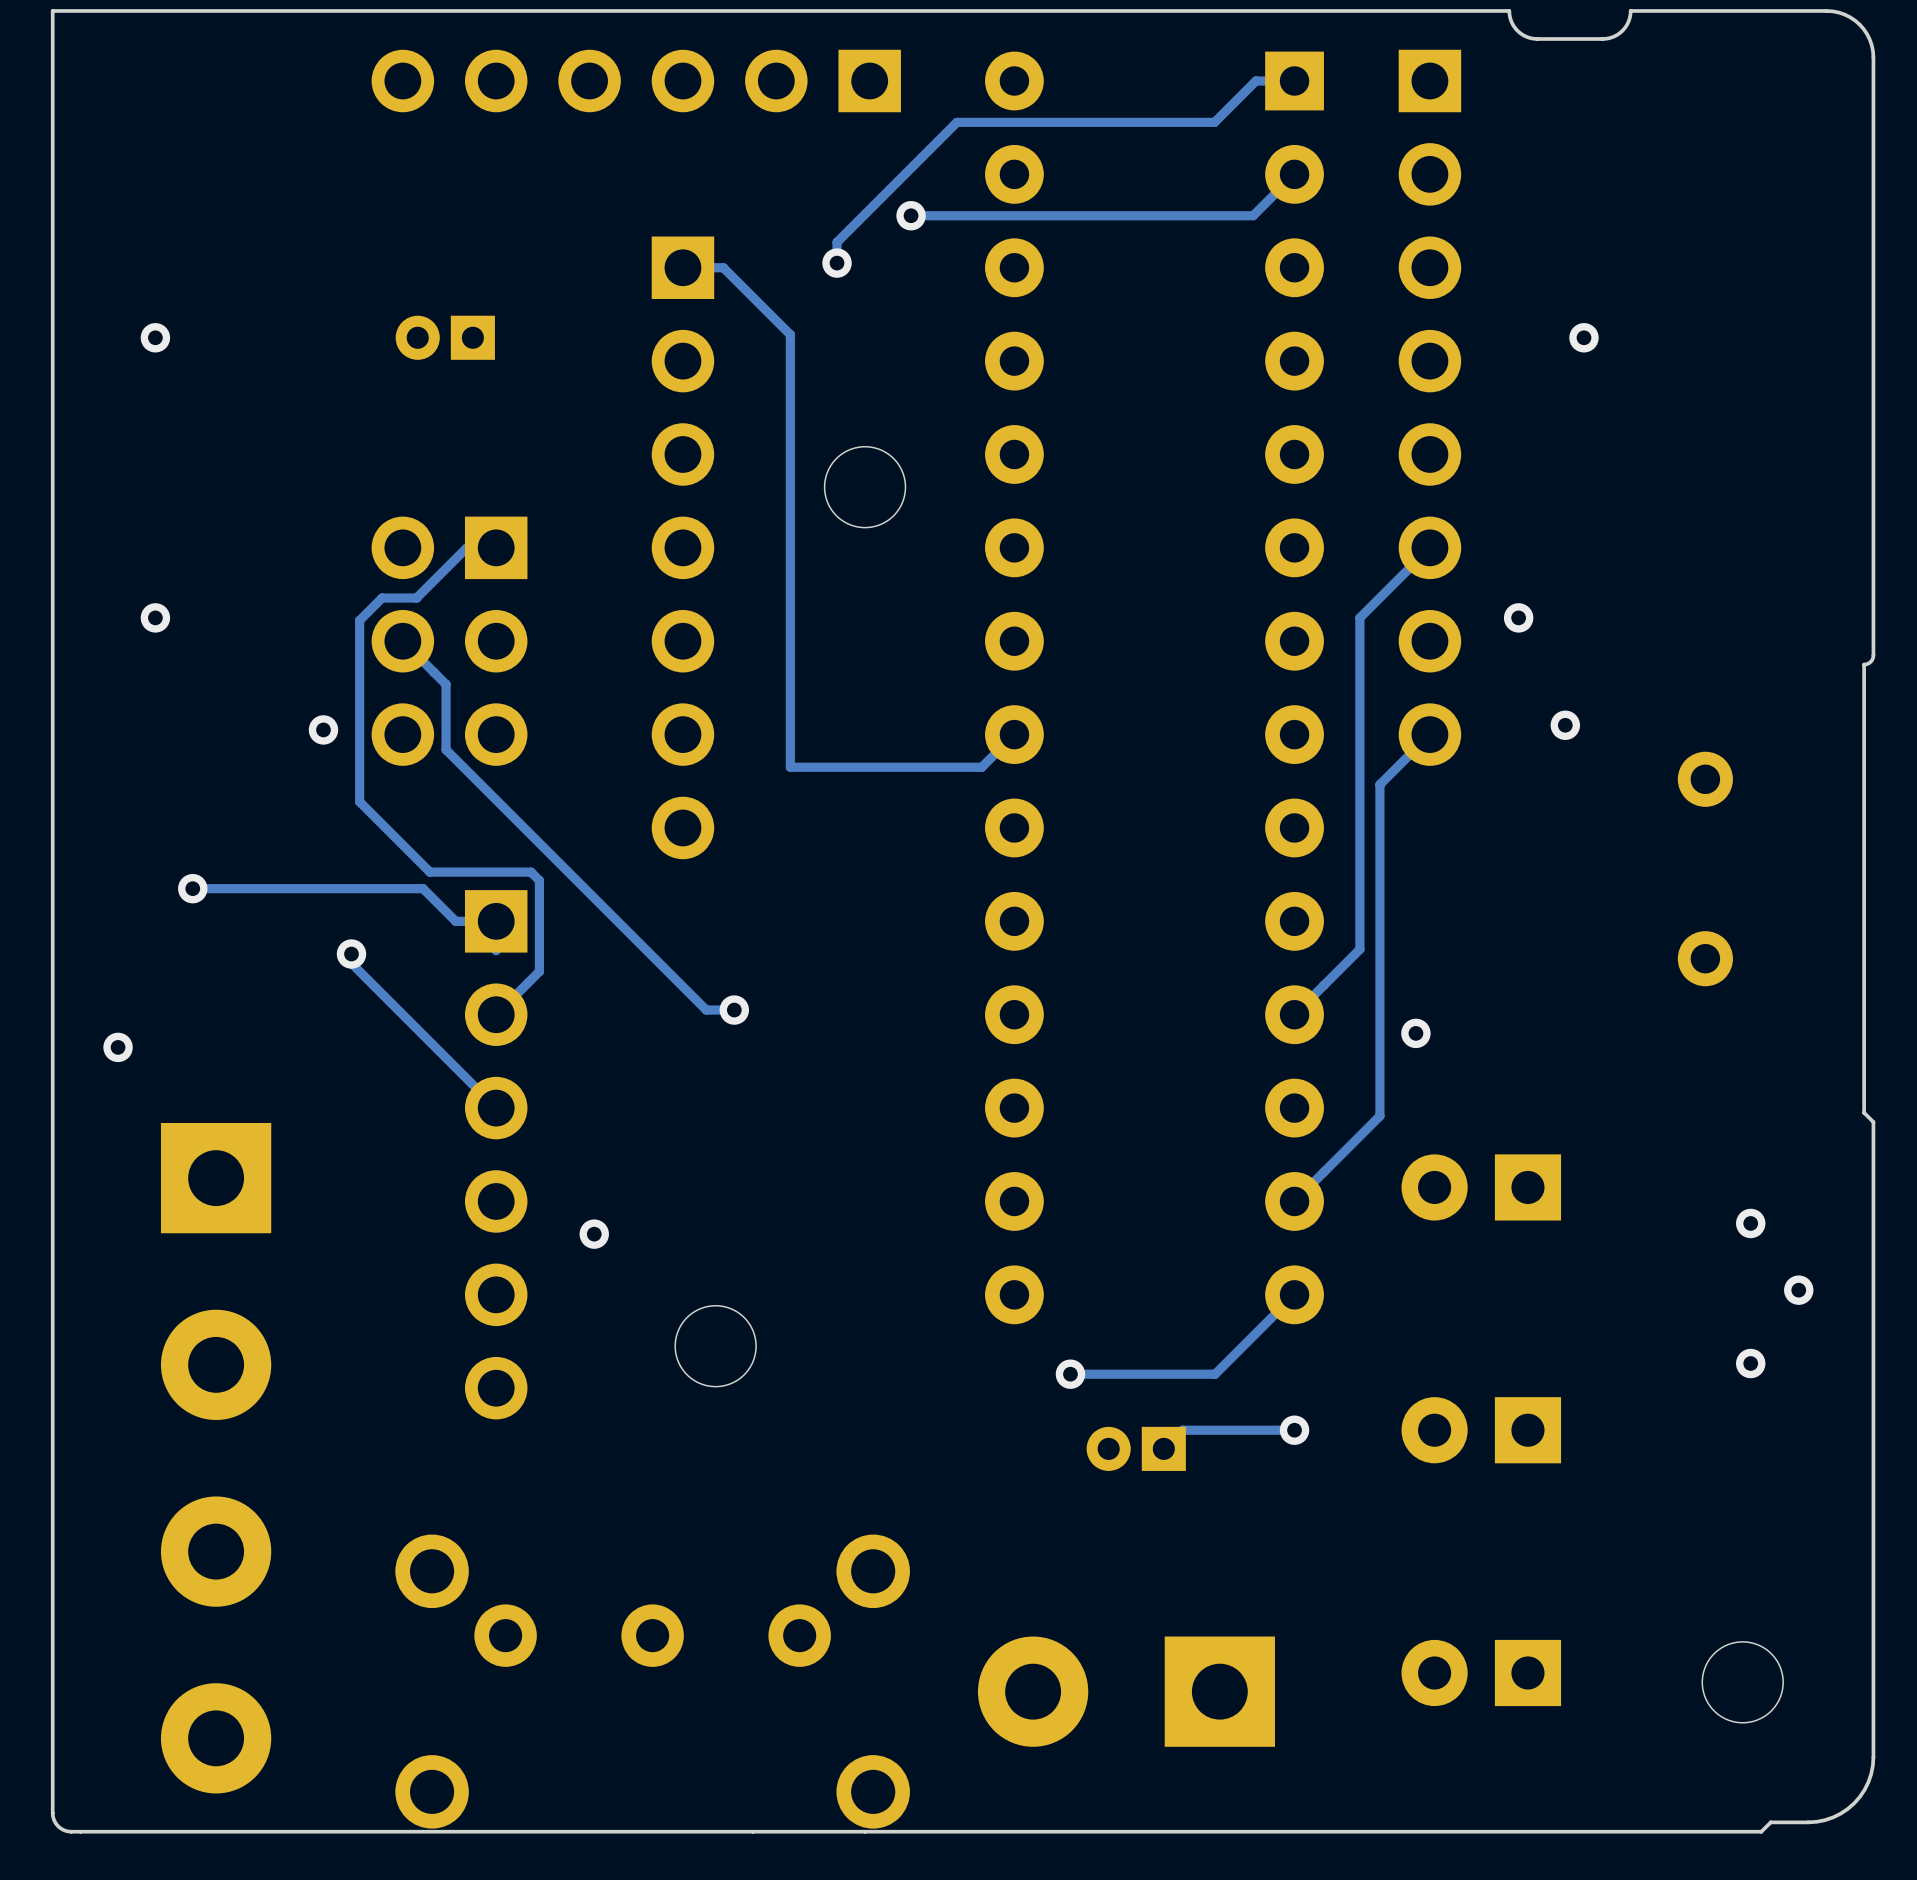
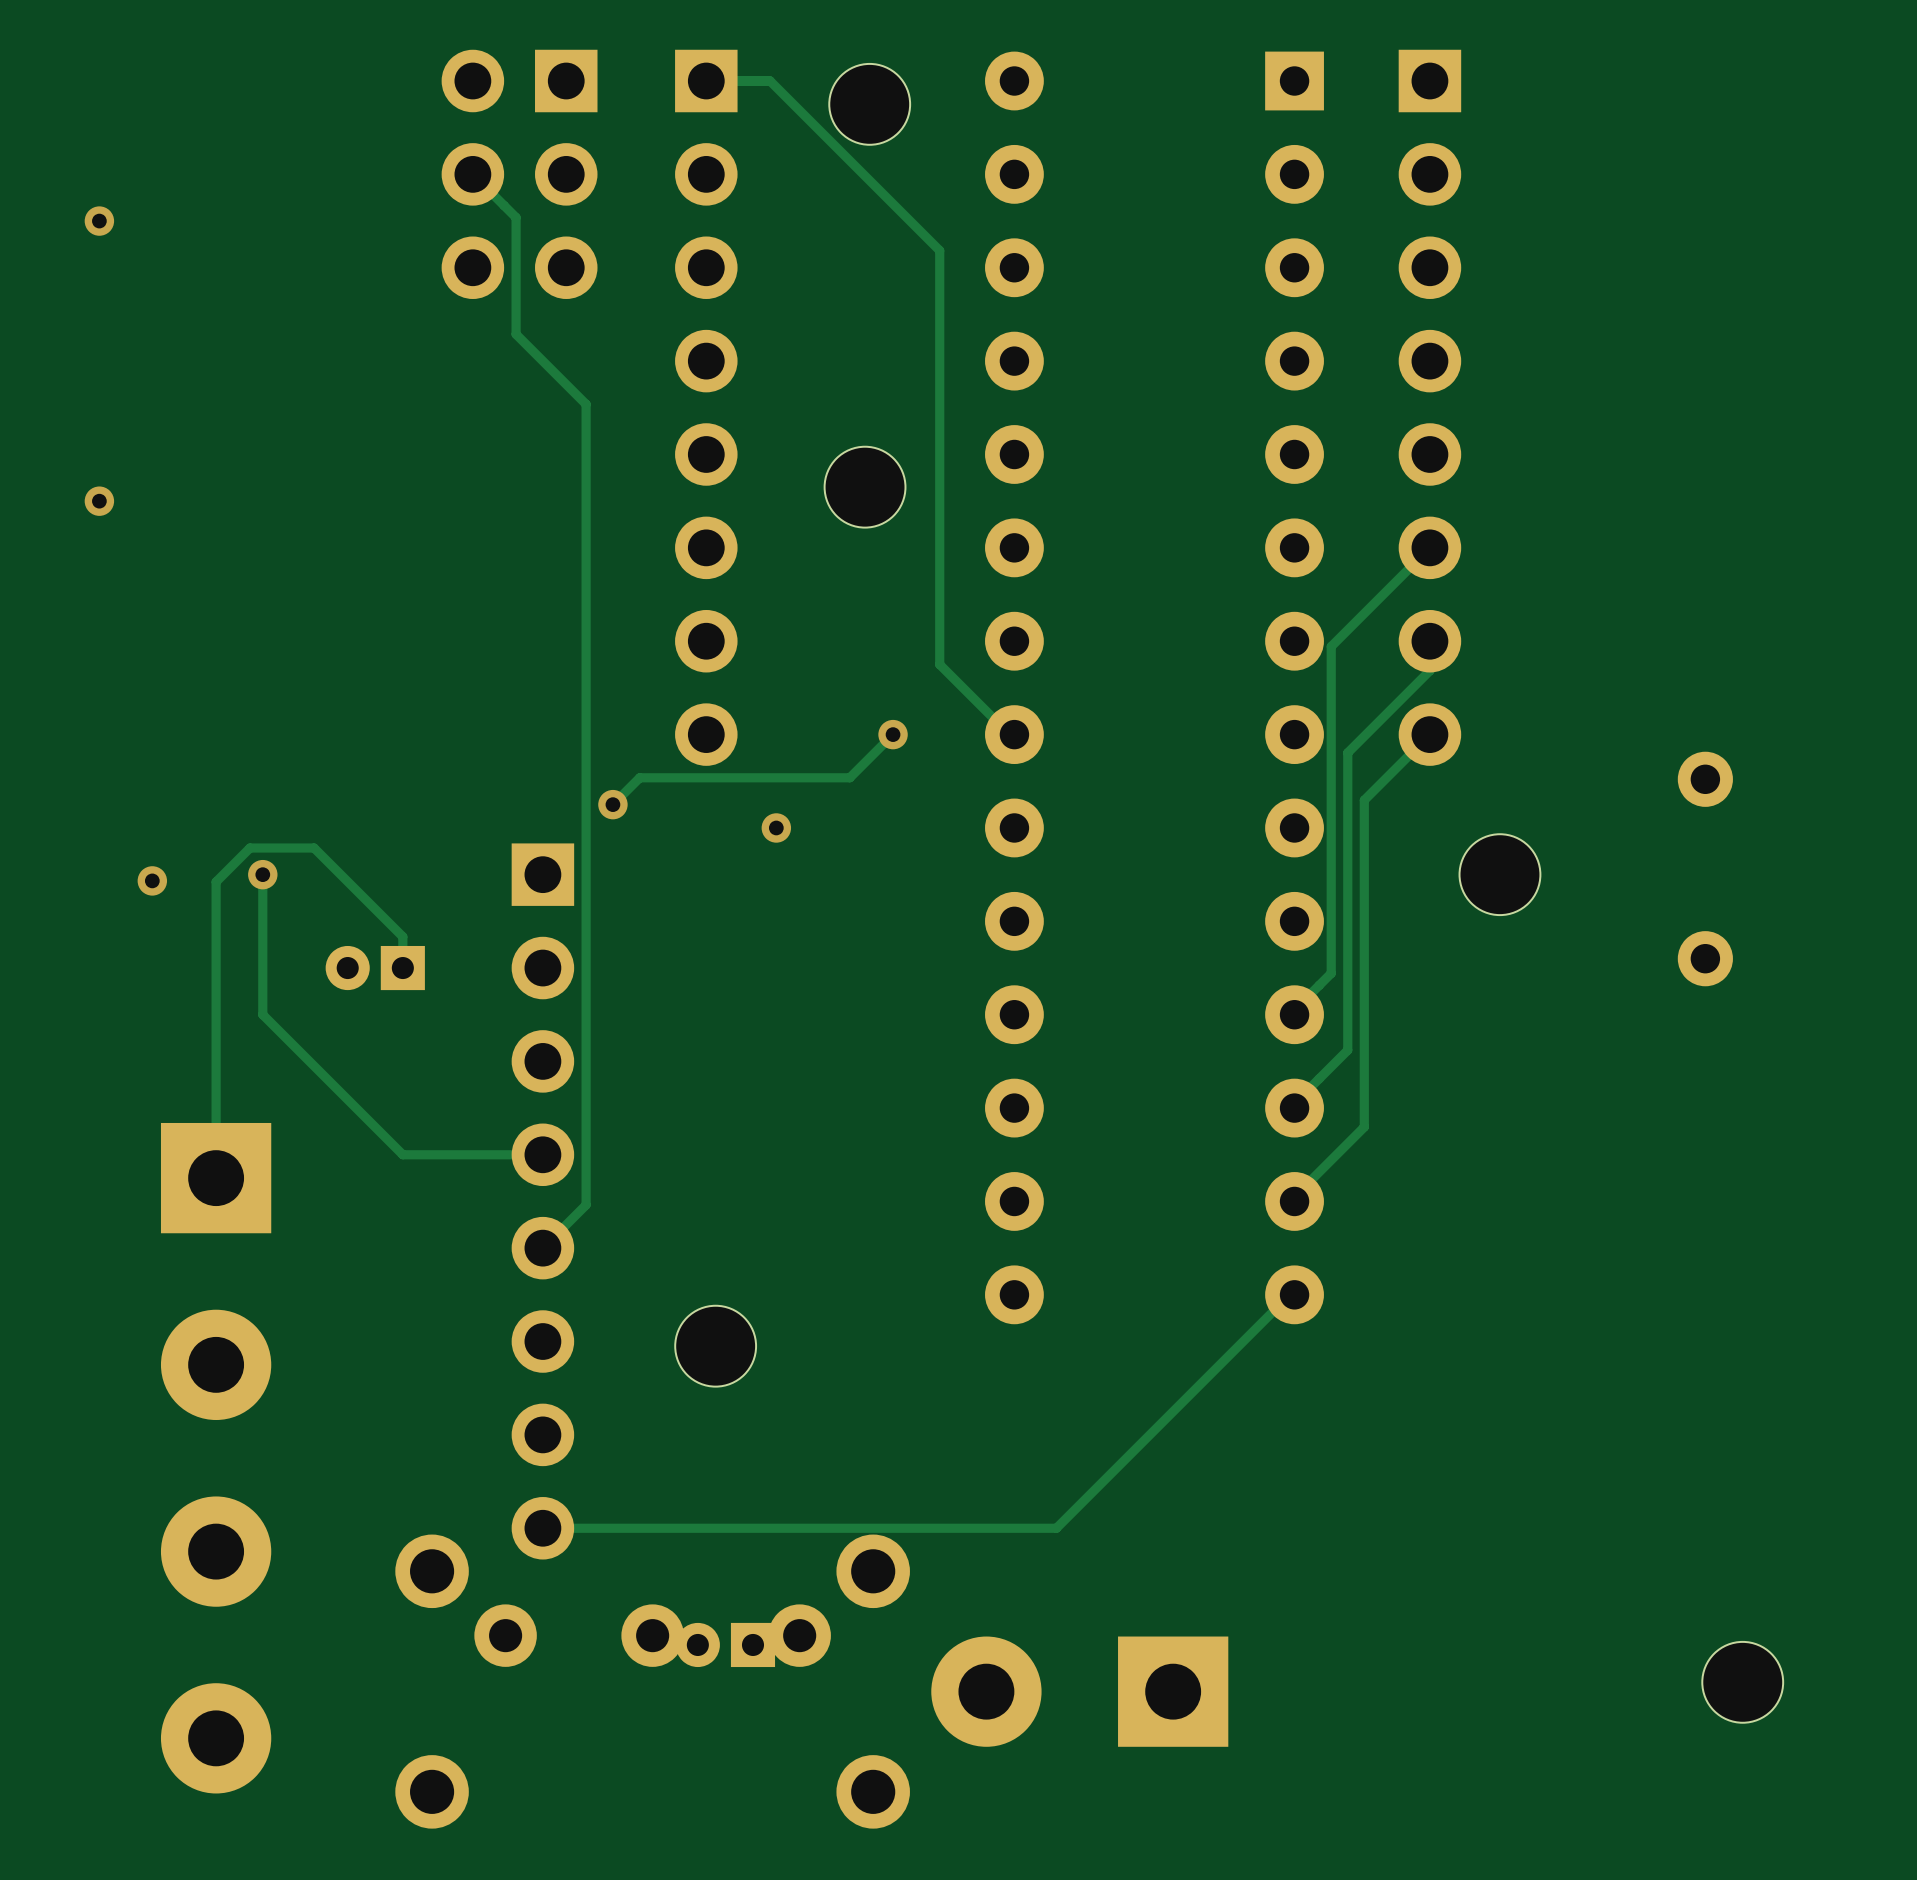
board edge: (1826, 10) (1630, 10) (1624, 28) (1609, 38) (1537, 38) (1526, 36) (1517, 30) (1511, 21) (1509, 10) (52, 10) (52, 1813) (58, 1826) (71, 1831) (1761, 1831) (1770, 1822) (1808, 1822) (1825, 1820) (1840, 1813) (1854, 1803) (1868, 1782) (1873, 1757) (1873, 1122) (1864, 1112) (1864, 664) (1870, 661) (1873, 655) (1873, 57) (1869, 39) (1859, 24) (1844, 14) (1826, 10) -> none
part: (636, 81) -> none
track: none -> (706, 81) (770, 81) (939, 250) (939, 664) (1009, 734)
track: (1294, 81) (1255, 81) (1214, 122) (956, 122) (837, 242) (837, 263) -> none
part: none -> (869, 104)
track: none -> (472, 174) (516, 217) (516, 334) (586, 404) (586, 1204) (542, 1248)
track: (1294, 174) (1253, 215) (911, 215) -> none
via: (911, 215) -> none
via: none -> (99, 221)
via: (837, 263) -> none
track: (682, 267) (723, 267) (790, 334) (790, 767) (981, 767) (1014, 734) -> none
via: (155, 337) -> none
part: (445, 337) -> none
via: (1584, 337) -> none
part: none -> (706, 407)
via: none -> (99, 501)
track: (496, 547) (466, 547) (416, 598) (382, 598) (359, 620) (359, 801) (429, 872) (530, 872) (539, 880) (539, 971) (496, 1014) -> none
part: (682, 547) -> none
via: (155, 617) -> none
track: (1359, 617) (1359, 949) (1294, 1014) -> (1359, 617) (1331, 646) (1331, 973) (1289, 1014)
via: (1518, 617) -> none
track: (402, 641) (446, 684) (446, 749) (706, 1010) (734, 1010) -> none
part position: (449, 641) -> (519, 174)
track: none -> (1429, 641) (1429, 670) (1347, 752) (1347, 1050) (1289, 1108)
via: (1565, 725) -> none
via: (323, 729) -> none
track: none -> (893, 734) (849, 777) (639, 777) (612, 804)
via: none -> (893, 734)
track: (1379, 784) (1379, 1116) (1294, 1201) -> (1379, 784) (1364, 800) (1364, 1127) (1289, 1201)
via: none -> (612, 804)
via: none -> (776, 827)
track: none -> (262, 874) (262, 1014) (402, 1154) (542, 1154)
via: none -> (262, 874)
part: none -> (1499, 874)
via: none -> (152, 880)
track: (192, 888) (423, 888) (455, 921) (496, 921) (496, 950) -> none
via: (192, 888) -> none
track: (351, 954) (351, 963) (496, 1108) -> none
via: (351, 954) -> none
part: none -> (375, 968)
track: none -> (402, 968) (402, 936) (314, 848) (250, 848) (216, 881) (216, 1178)
via: (734, 1010) -> none
via: (1415, 1033) -> none
via: (118, 1047) -> none
part: (496, 1154) -> none
part: (1481, 1187) -> none
part: none -> (542, 1201)
via: (1750, 1223) -> none
via: (594, 1234) -> none
via: (1798, 1290) -> none
track: none -> (1289, 1294) (1056, 1528) (542, 1528)
track: (1294, 1294) (1215, 1374) (1070, 1374) -> none
via: (1750, 1363) -> none
via: (1070, 1374) -> none
track: (1294, 1430) (1182, 1430) (1163, 1448) (1159, 1448) -> none
via: (1294, 1430) -> none
part: (1481, 1430) -> none
part: (1136, 1448) -> none
part: none -> (725, 1644)
part: (1481, 1672) -> none
part position: (1126, 1691) -> (1079, 1691)

